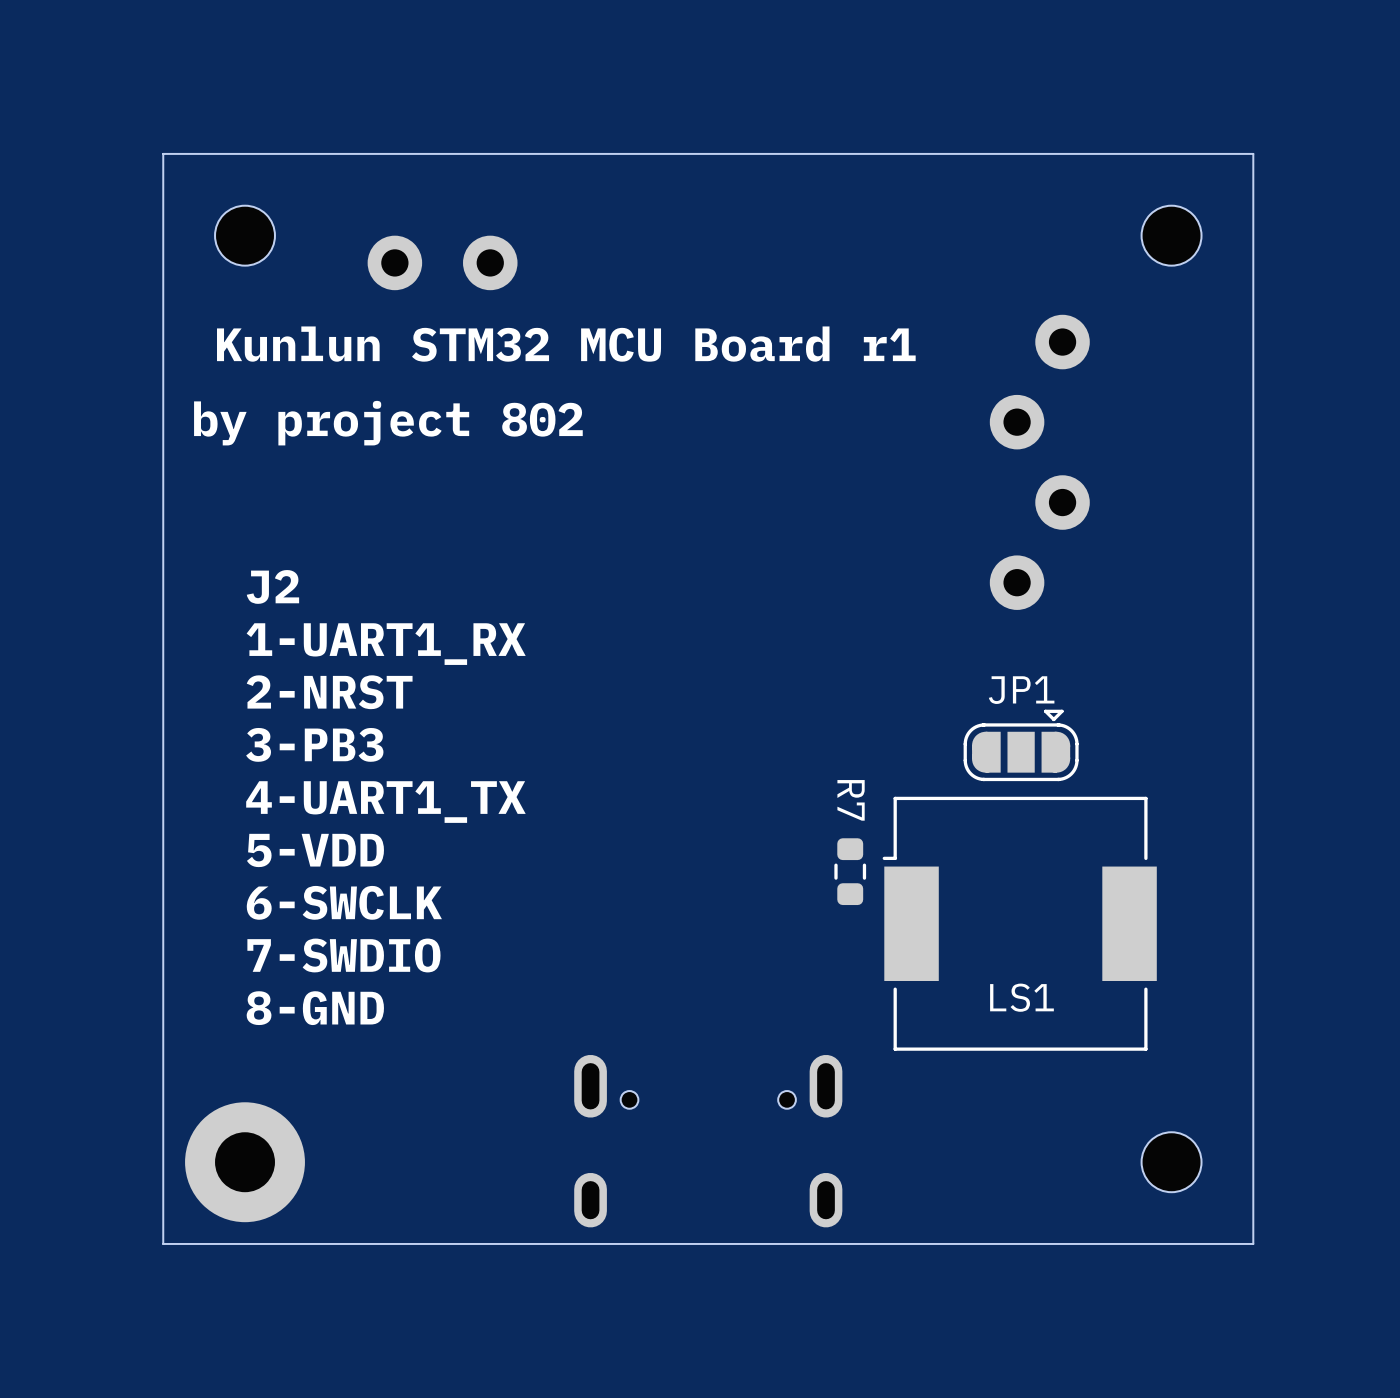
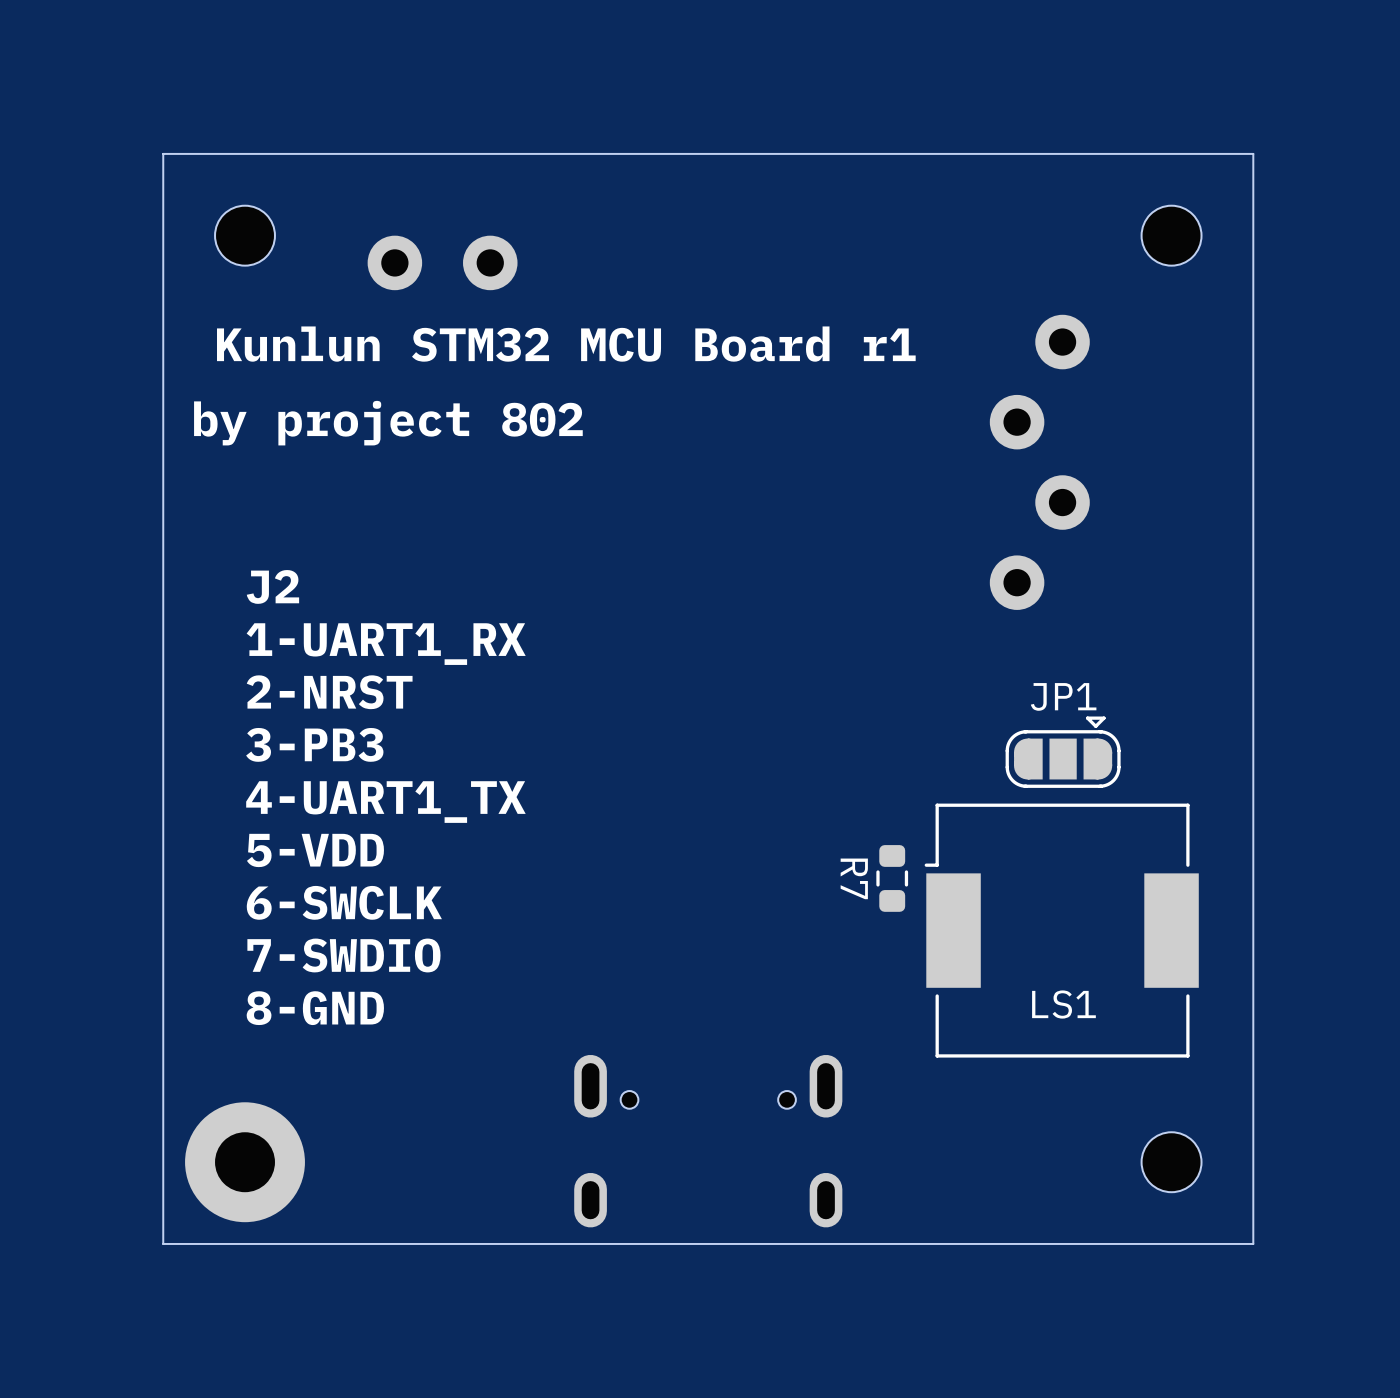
JP1 position: (1021, 745) -> (1063, 752)
R7 name position: R7 (851, 800) -> R7 (854, 878)
R7 position: (850, 871) -> (892, 878)
LS1 position: (1019, 923) -> (1061, 930)

